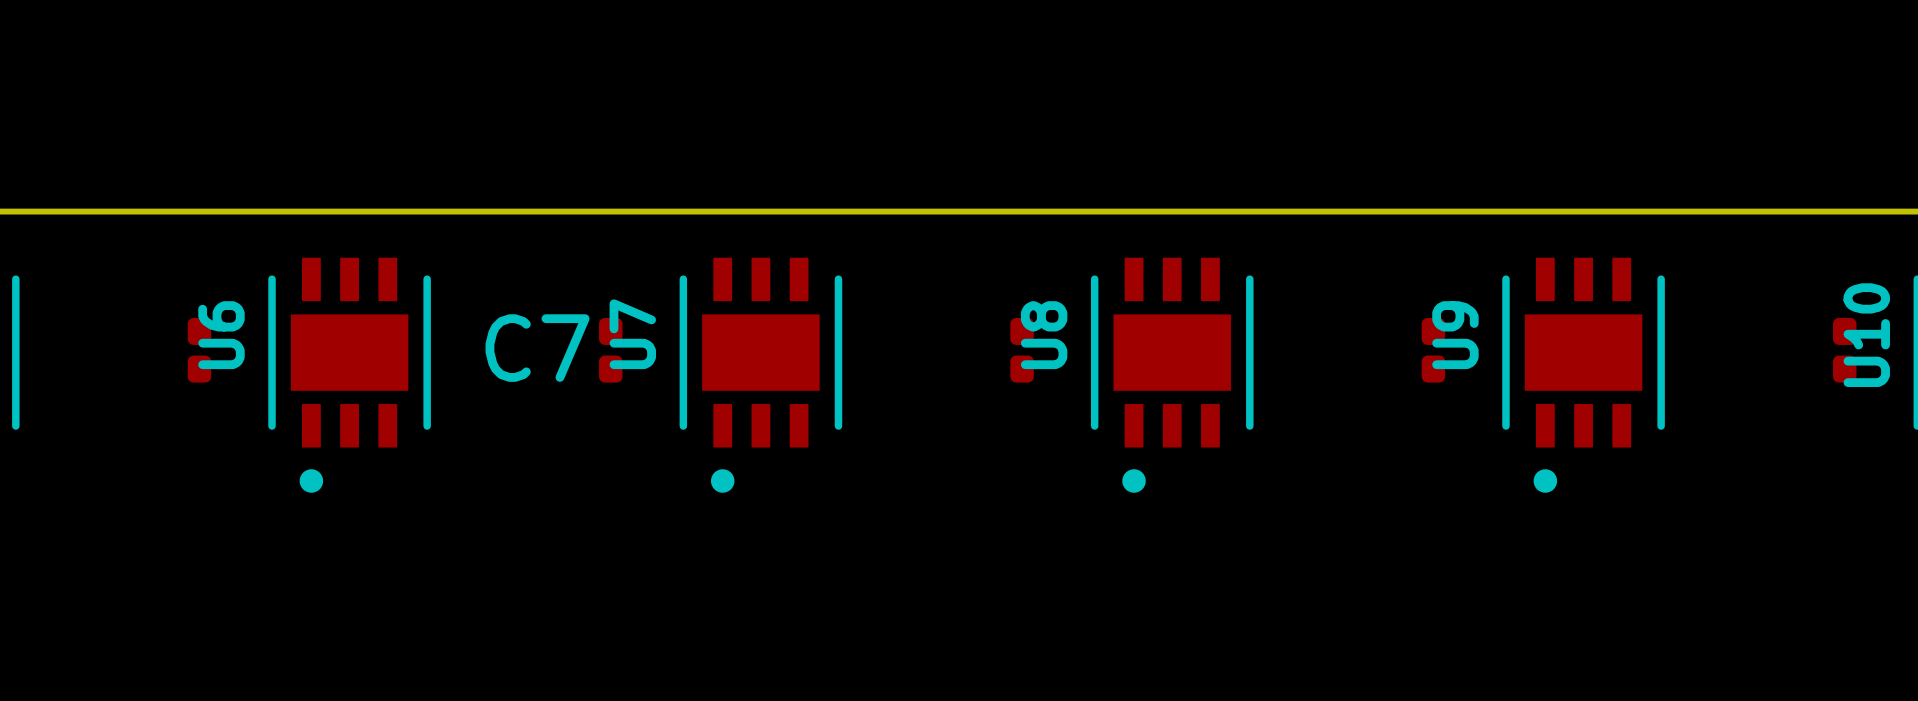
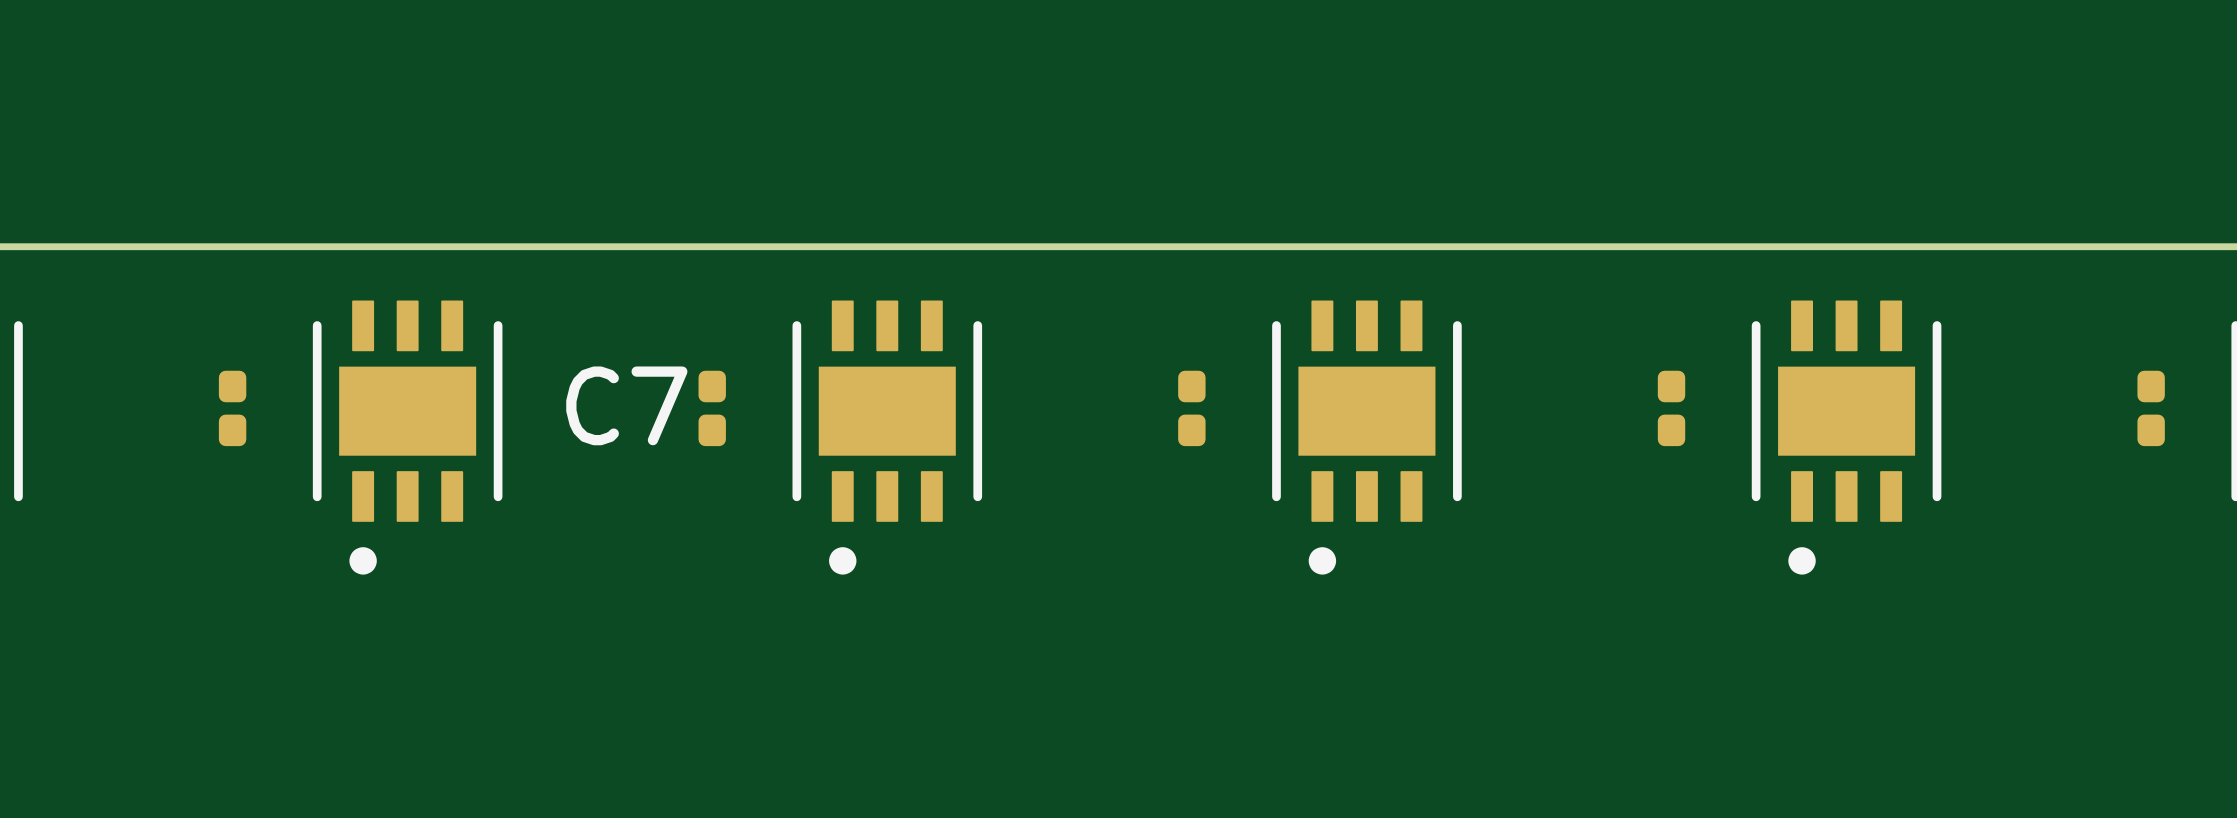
U7 name: U7 (632, 334) -> none
U6 name: U6 (221, 335) -> none
U8 name: U8 (1044, 335) -> none
U9 name: U9 (1455, 335) -> none
U10 name: U10 (1866, 335) -> none

